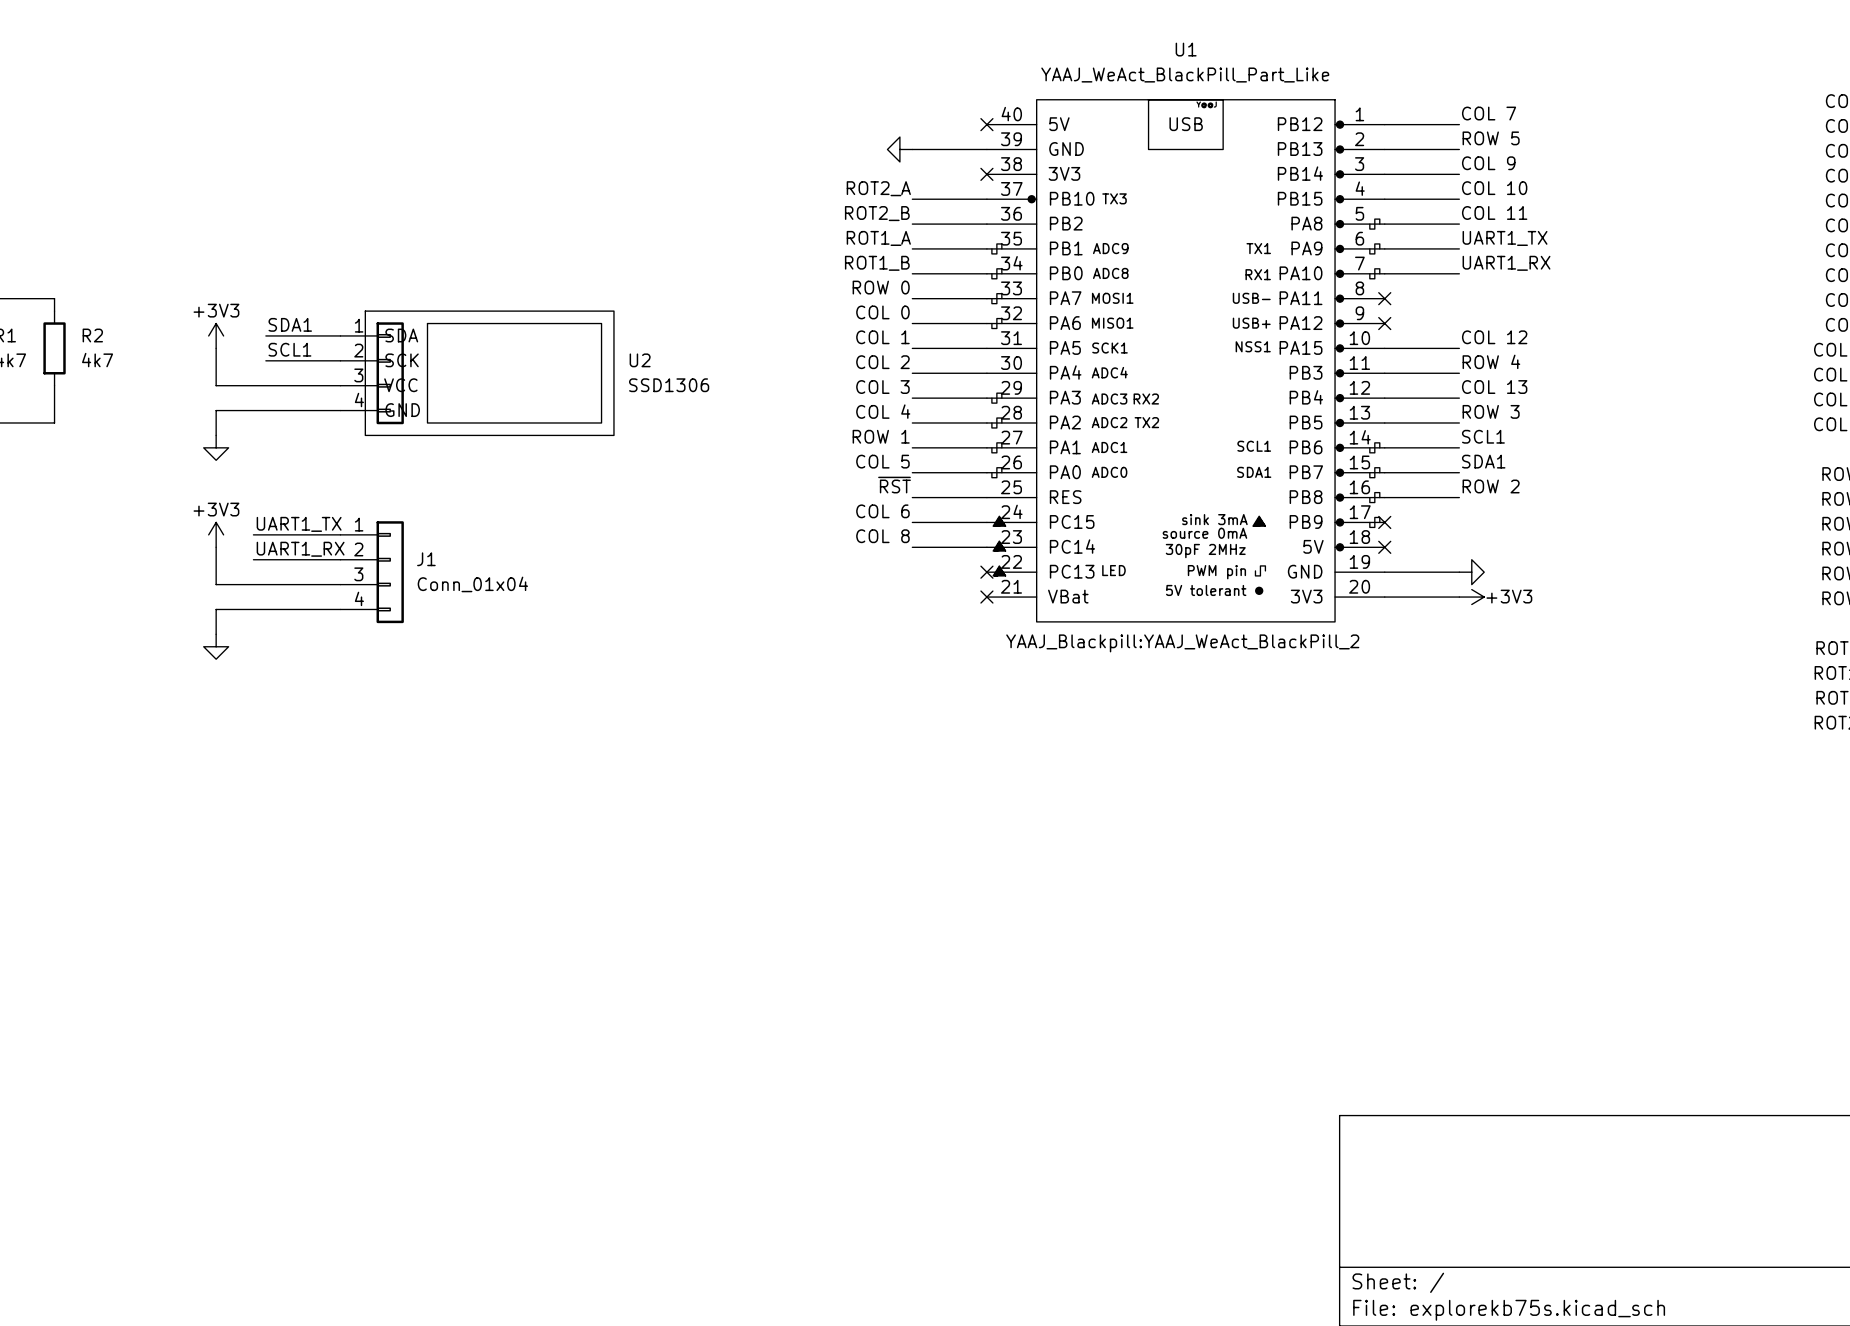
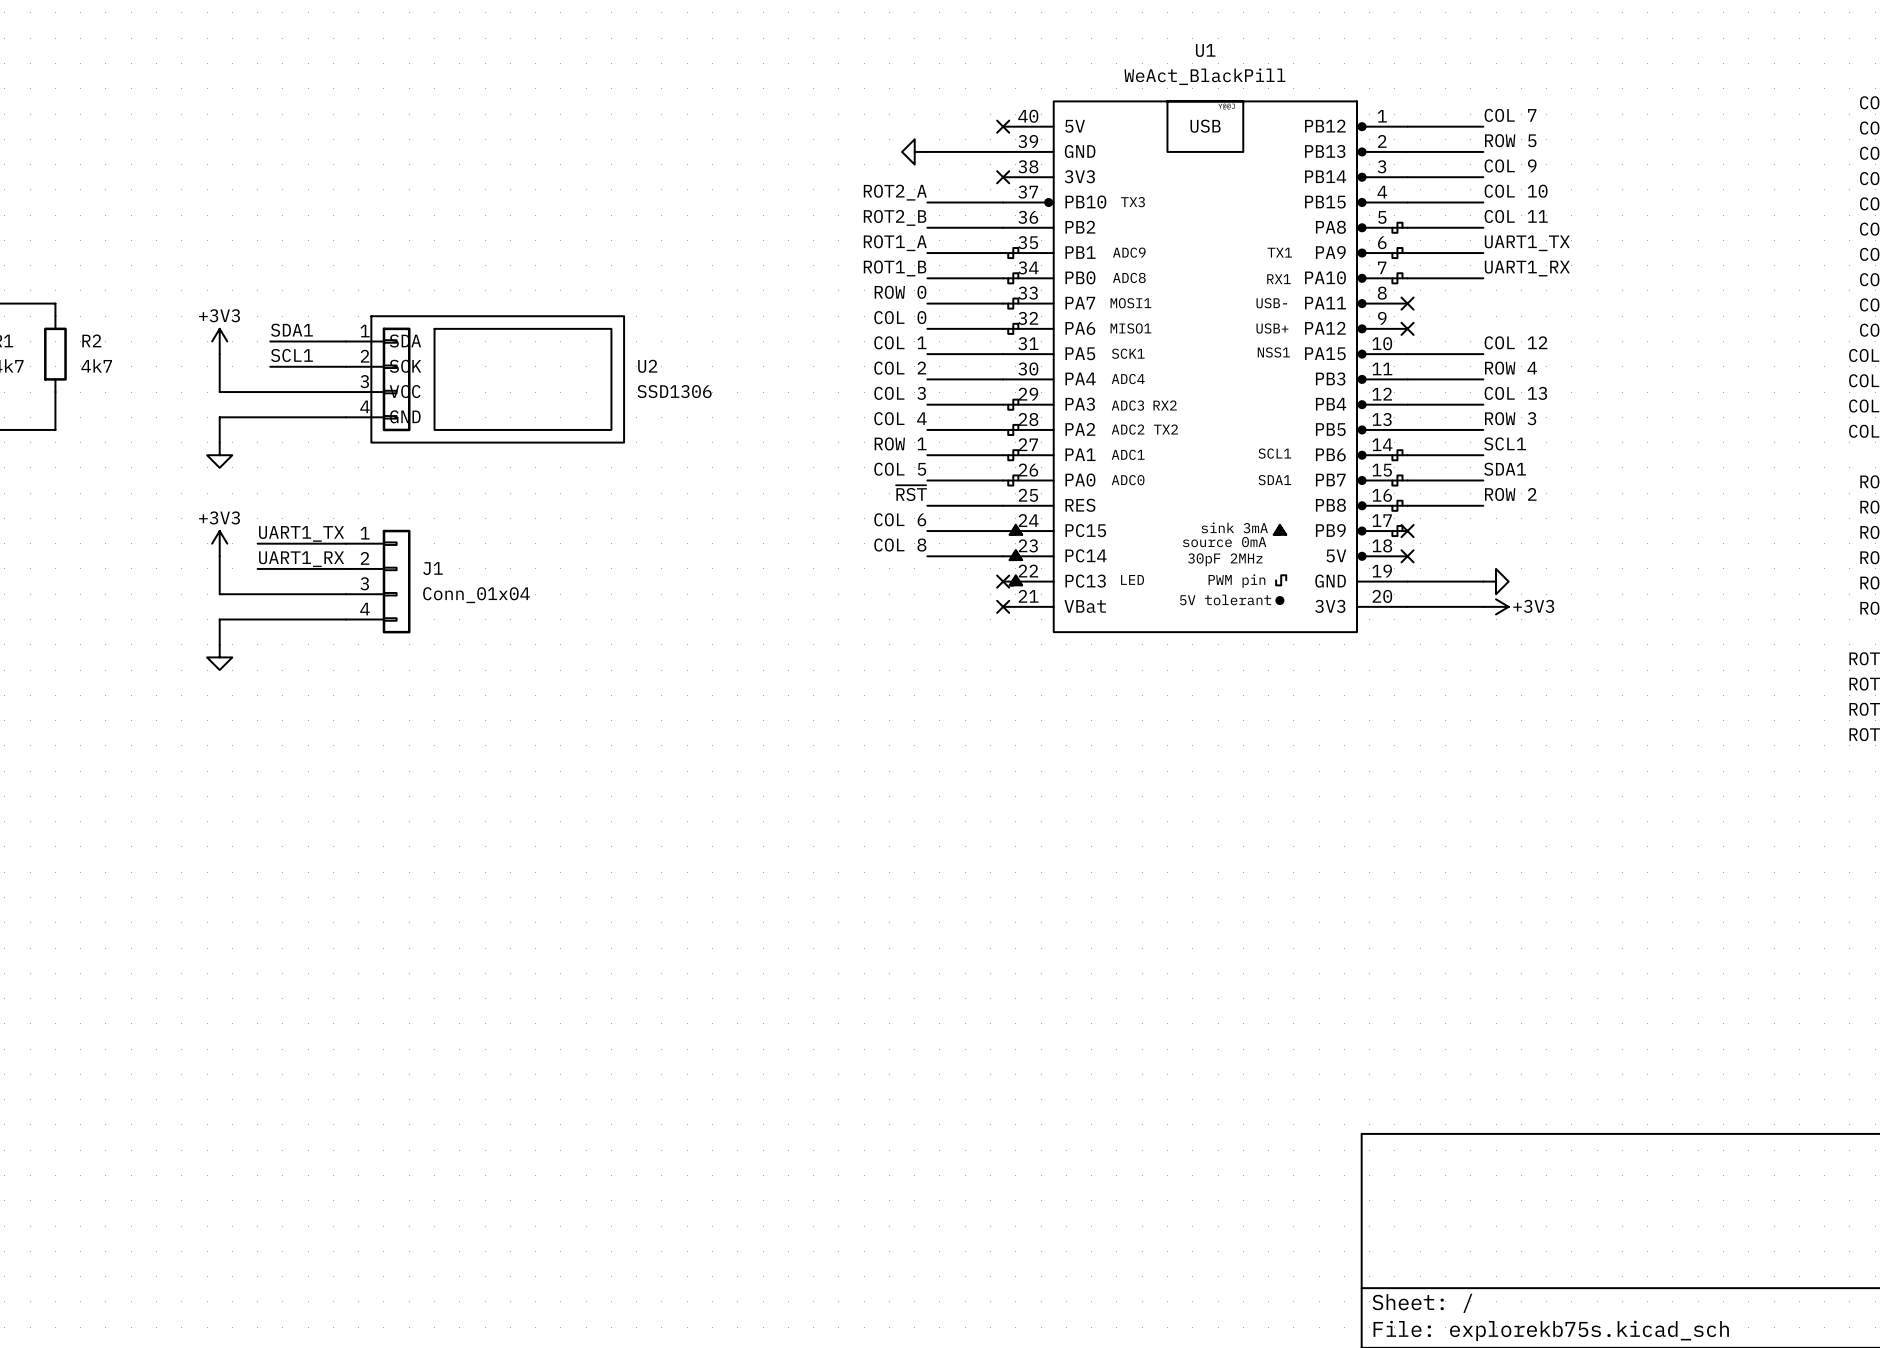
U1 value: YAAJ_WeAct_BlackPill_Part_Like (1185, 75) -> WeAct_BlackPill (1204, 76)
U1 text: YAAJ_Blackpill:YAAJ_WeAct_BlackPill_2 (1182, 643) -> none

